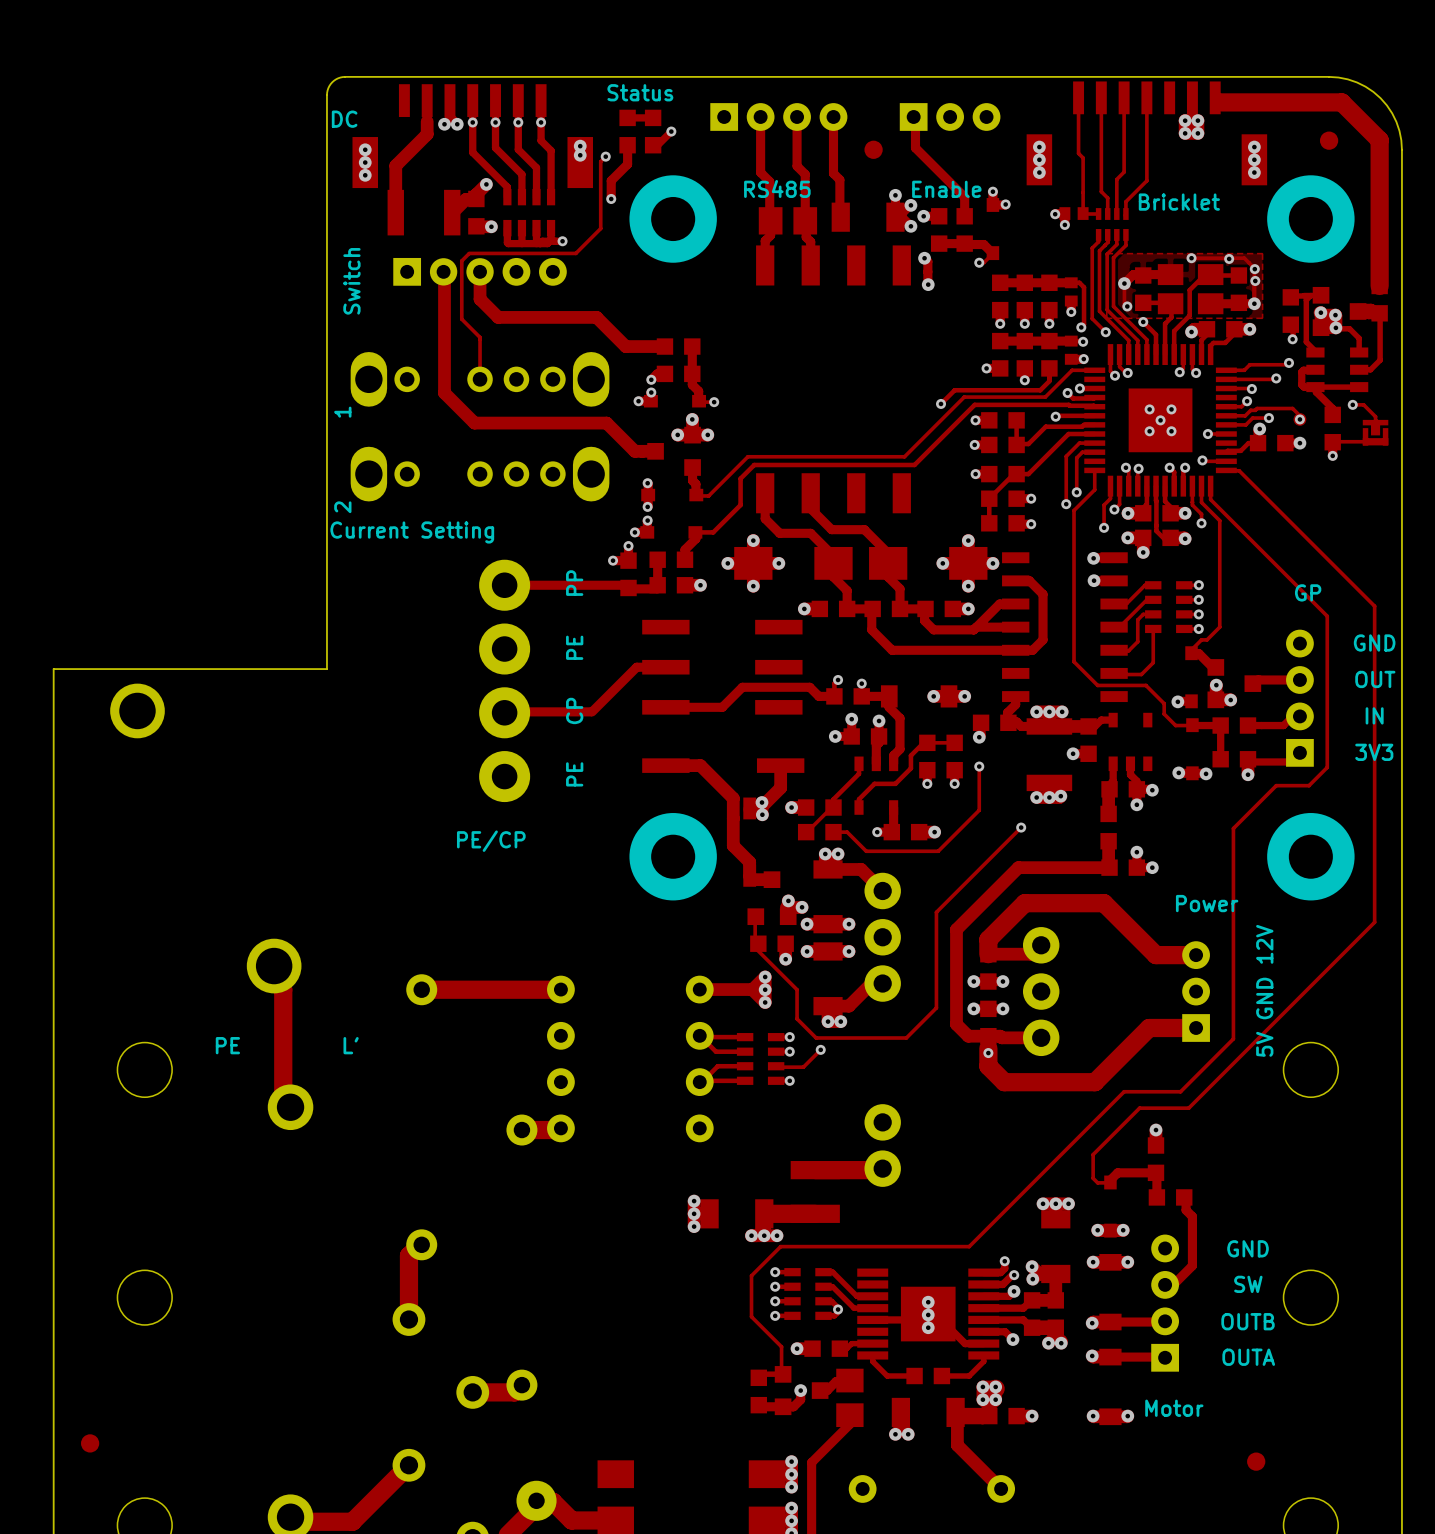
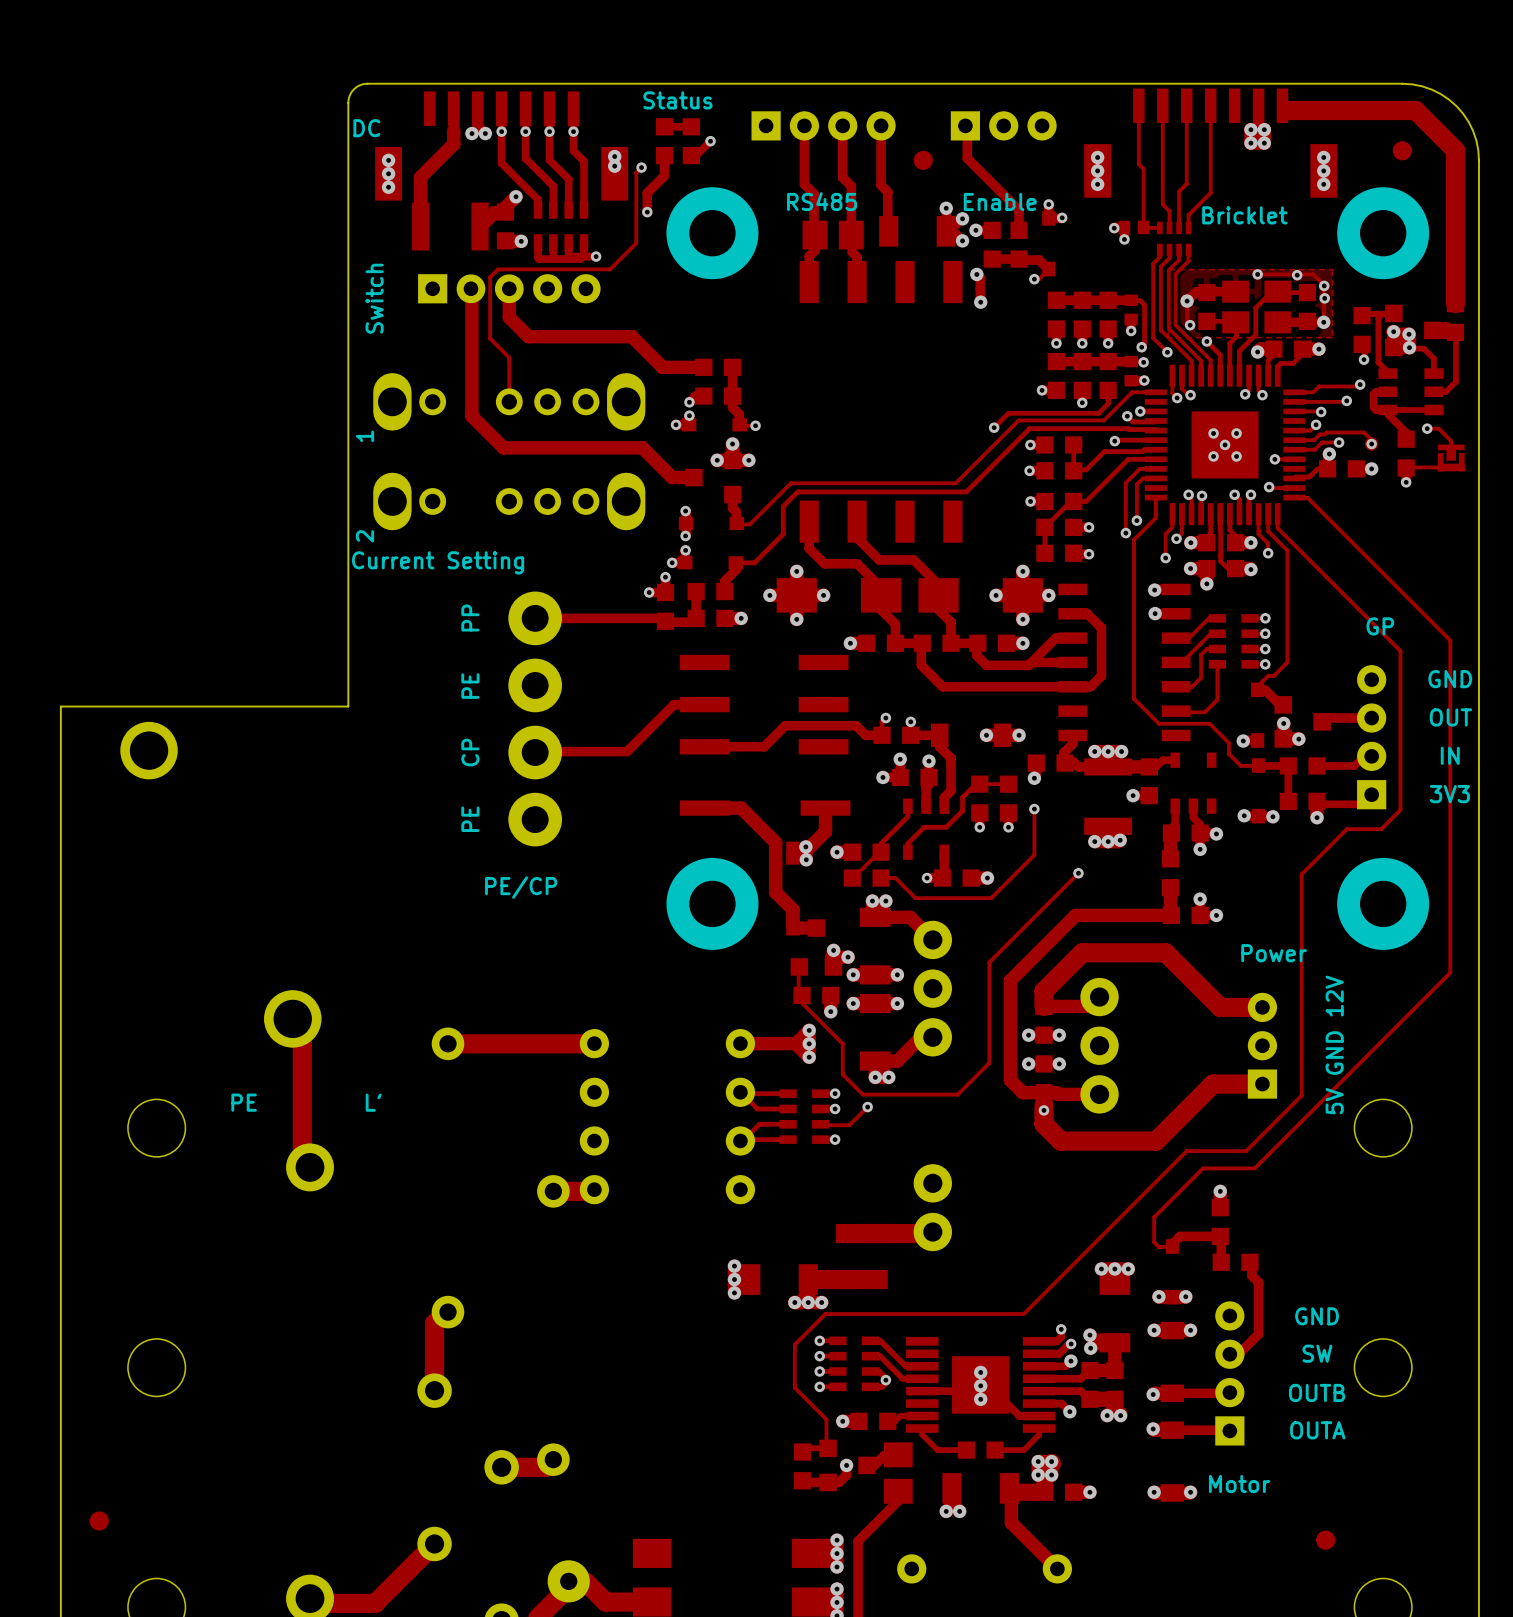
text position: PP (574, 583) -> PP (470, 618)
text: PE (574, 647) -> none
text: none -> PE (470, 686)
text position: CP (574, 710) -> CP (470, 752)
text: PE (574, 774) -> none
text: none -> PE (470, 819)

